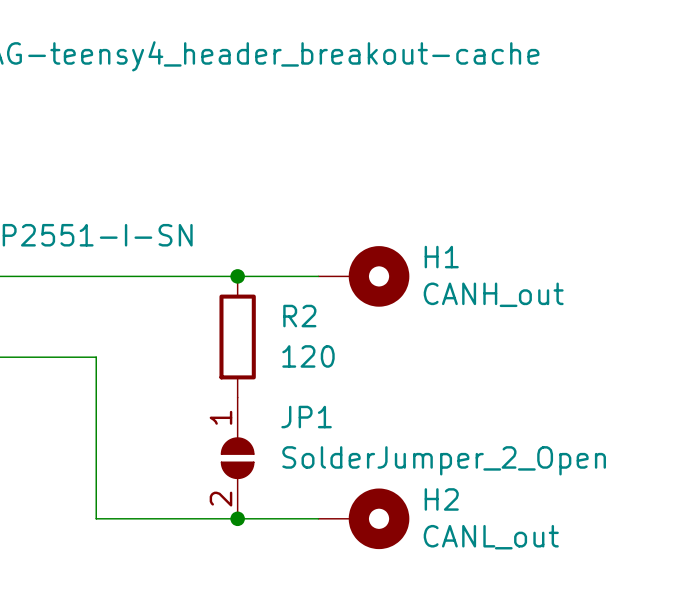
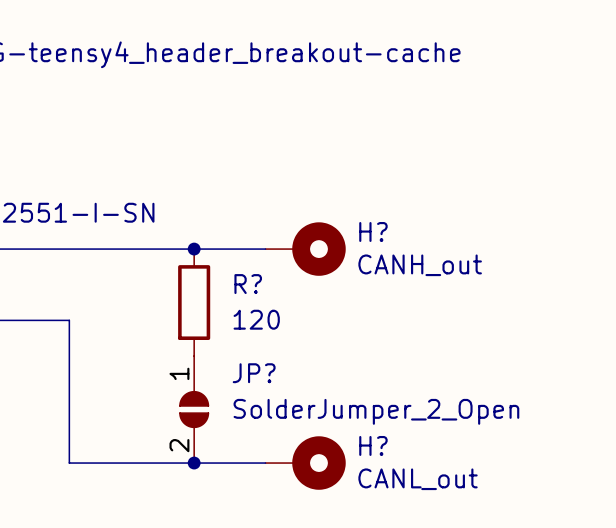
H1 name: H1 (441, 257) -> H? (373, 231)
R2 name: R2 (299, 316) -> R? (248, 284)
JP1 name: JP1 (306, 417) -> JP? (254, 373)
H2 name: H2 (441, 499) -> H? (373, 445)

